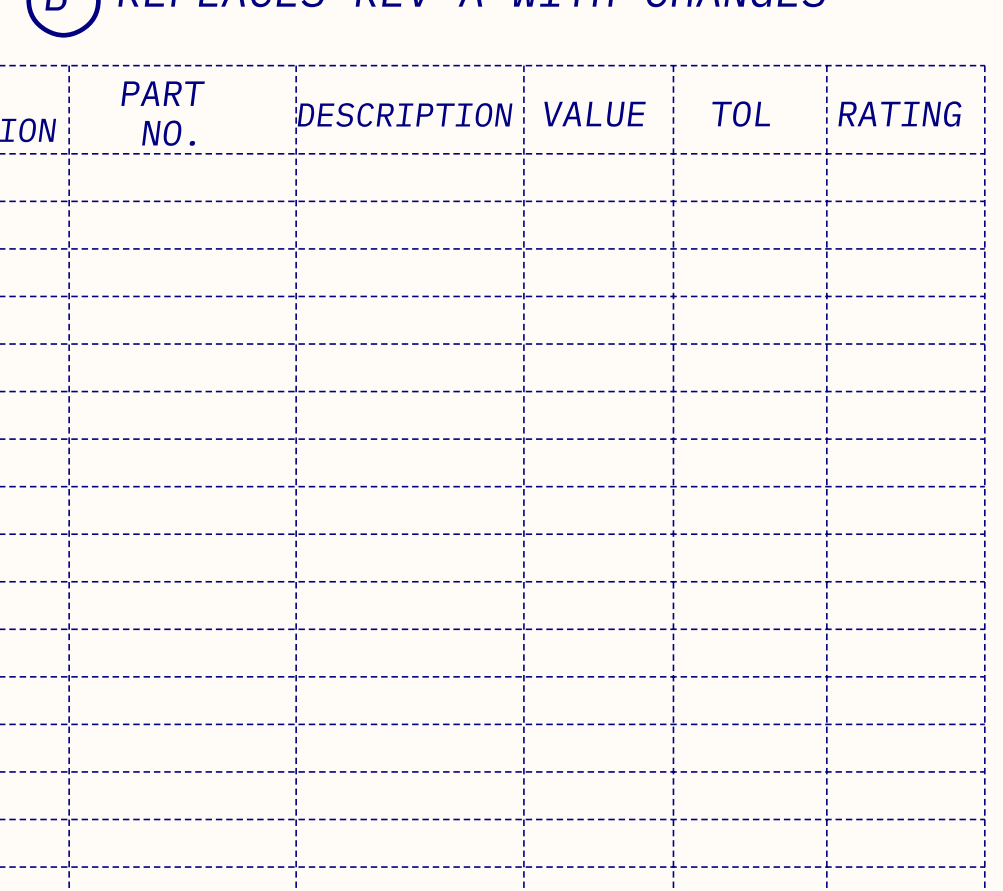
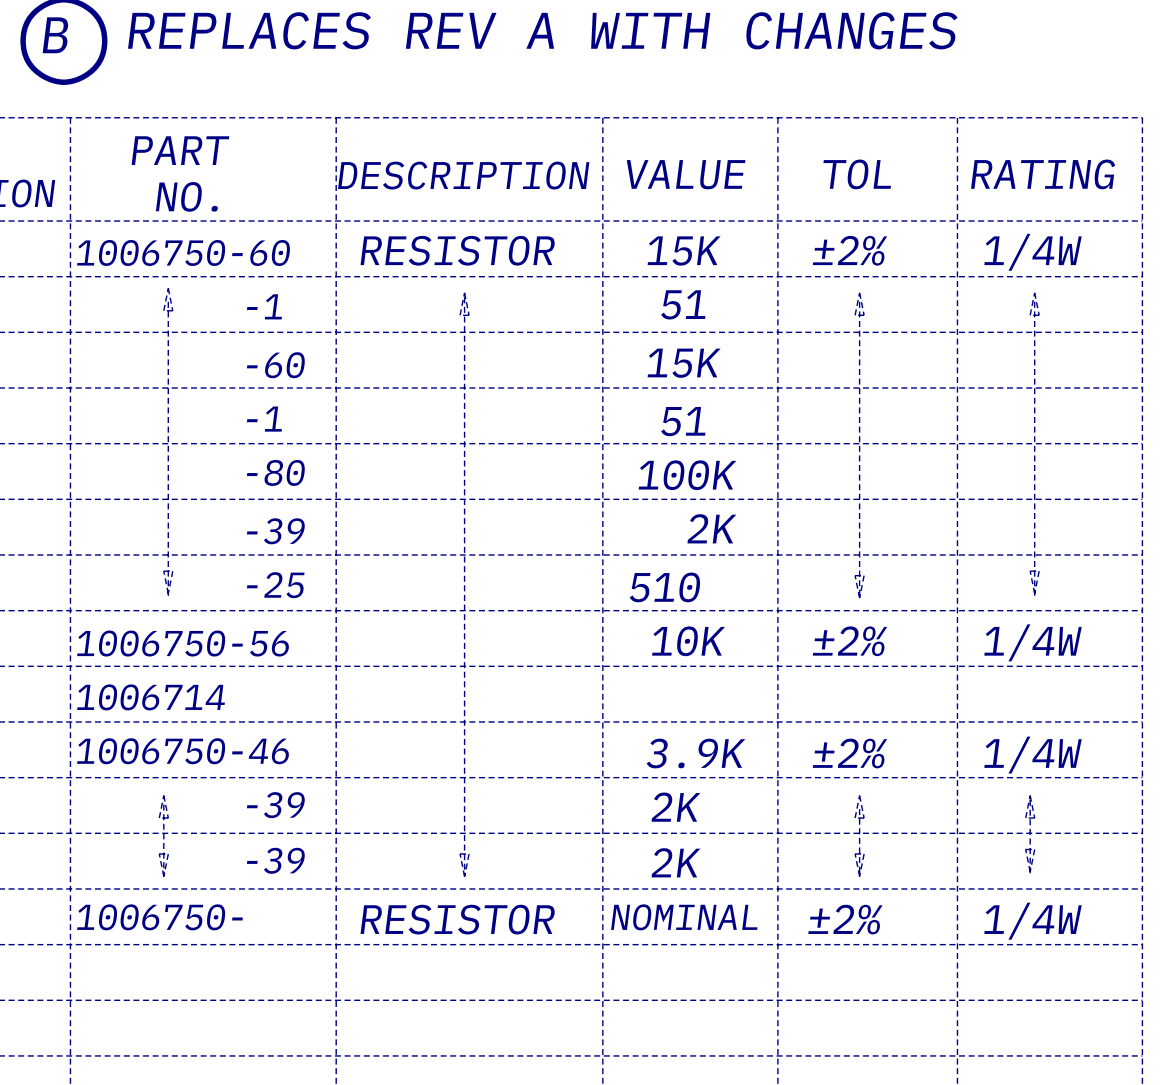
text: none -> RESISTOR (457, 250)
text: none -> 15K (684, 250)
text: none -> ±2% (849, 250)
text: none -> 1/4W (1033, 252)
text: none -> 1006750-60 (183, 252)
line: none -> (168, 288) (172, 310) (163, 310) (168, 288)
line: none -> (464, 292) (469, 315) (460, 315) (464, 292)
line: none -> (859, 292) (864, 315) (855, 315) (859, 292)
line: none -> (1034, 292) (1039, 315) (1030, 315) (1034, 292)
line: none -> (464, 297) (464, 876)
line: none -> (168, 301) (168, 598)
line: none -> (859, 301) (859, 598)
line: none -> (1034, 301) (1034, 598)
text: none -> 51 (683, 304)
text: none -> -1 (264, 306)
text: none -> 15K (684, 363)
text: none -> -60 (275, 365)
text: none -> -1 (264, 419)
text: none -> 51 (683, 421)
text: none -> -80 (275, 472)
text: none -> 100K (687, 475)
text: none -> 2K (711, 528)
text: none -> -39 (275, 531)
line: none -> (163, 571) (172, 571) (168, 593) (163, 571)
line: none -> (1030, 571) (1034, 593) (1039, 571) (1030, 571)
text: none -> -25 (275, 585)
text: none -> 510 (664, 587)
line: none -> (859, 598) (855, 575) (864, 575) (859, 598)
text: none -> 10K (688, 641)
text: none -> ±2% (849, 641)
text: none -> 1006750-56 (183, 643)
text: none -> 1/4W (1033, 642)
text: none -> 1006714 (150, 697)
text: none -> 1006750-46 (183, 751)
text: none -> 3.9K (695, 753)
text: none -> ±2% (849, 753)
text: none -> 1/4W (1033, 755)
line: none -> (163, 795) (168, 818) (159, 818) (163, 795)
line: none -> (859, 795) (864, 818) (855, 818) (859, 795)
line: none -> (1030, 795) (1034, 818) (1025, 818) (1030, 795)
line: none -> (1030, 800) (1030, 876)
line: none -> (163, 804) (163, 876)
text: none -> -39 (275, 805)
text: none -> 2K (675, 807)
line: none -> (859, 809) (859, 876)
line: none -> (1025, 849) (1030, 871) (1034, 849) (1025, 849)
text: none -> -39 (275, 860)
text: none -> 2K (675, 862)
line: none -> (163, 876) (159, 853) (168, 853) (163, 876)
line: none -> (464, 876) (460, 853) (469, 853) (464, 876)
line: none -> (859, 876) (855, 853) (864, 853) (859, 876)
text: none -> 1006750- (159, 917)
text: none -> NOMINAL (684, 917)
text: none -> RESISTOR (457, 919)
text: none -> ±2% (845, 919)
text: none -> 1/4W (1033, 921)

